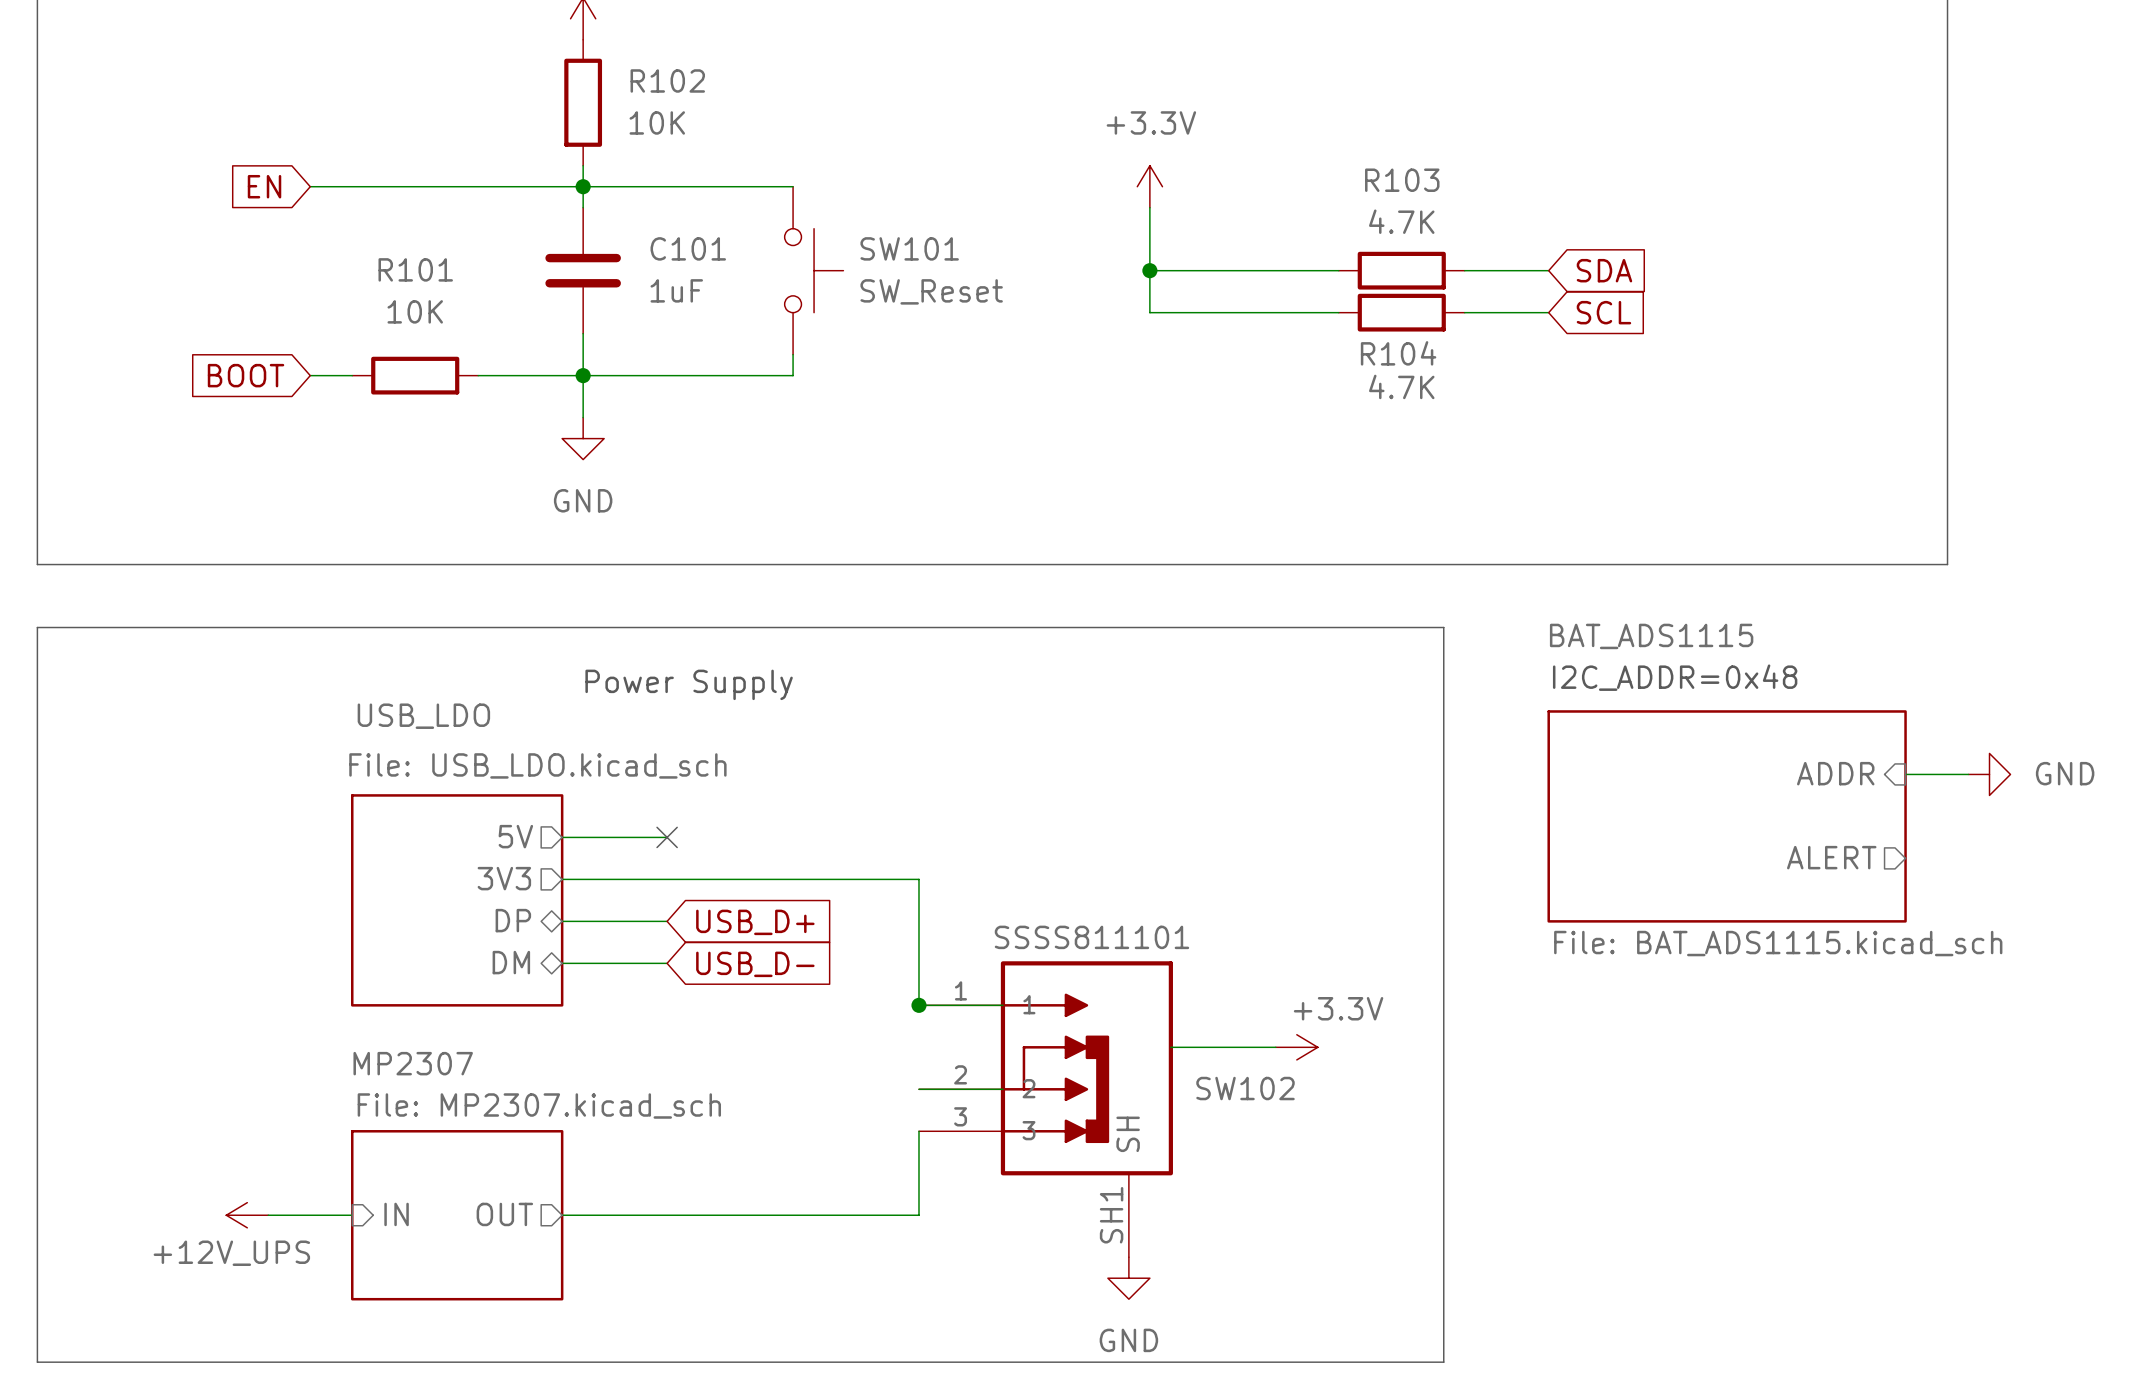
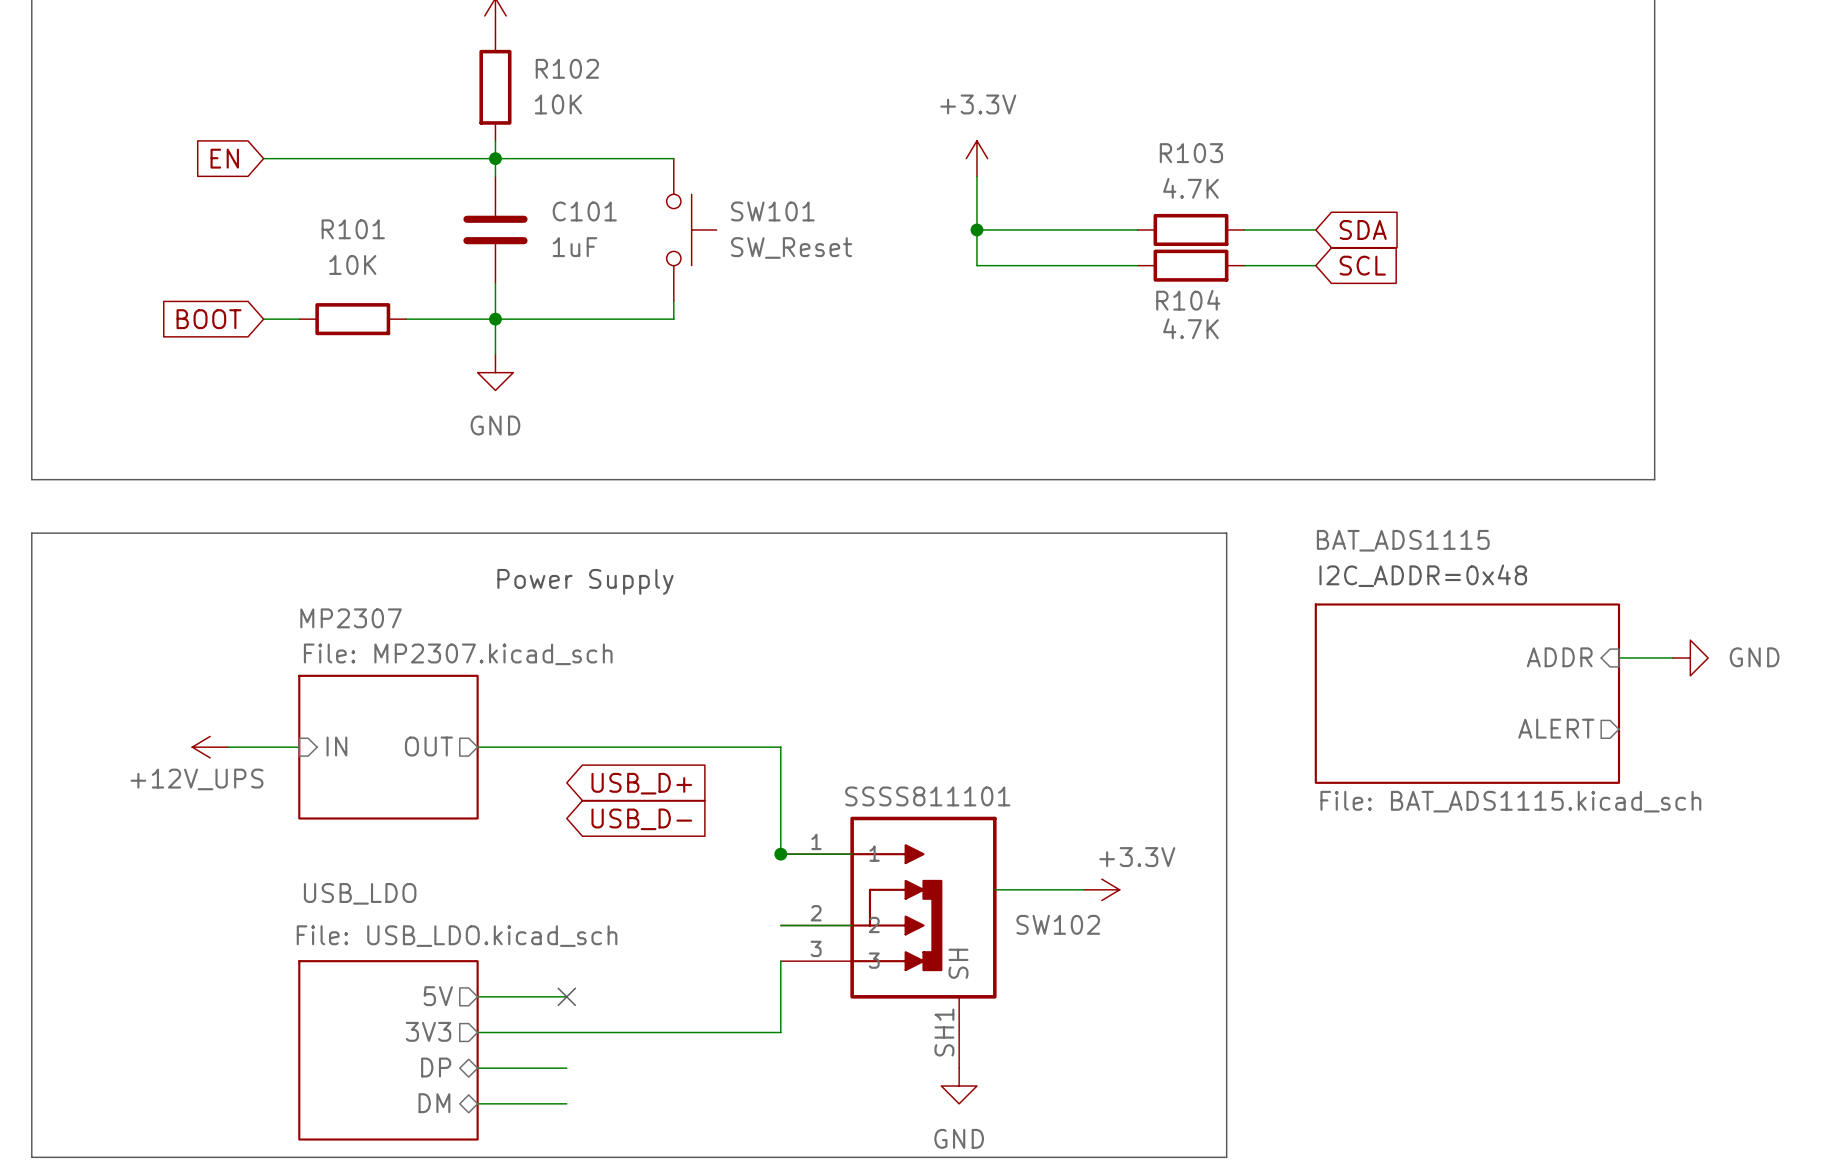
sheet pin position: 5V (515, 836) -> 5V (438, 996)
wire: (562, 837) (667, 837) -> (477, 996) (566, 996)
no-connect mark: (667, 837) -> none
sheet pin: 3V3 (504, 878) -> OUT (428, 746)
sheet USB_LDO position: (457, 900) -> (388, 1050)
sheet pin position: DP (513, 920) -> DP (436, 1067)
wire: (562, 921) (667, 921) -> (477, 1068) (566, 1068)
sheet pin position: DM (511, 962) -> DM (434, 1103)
wire: (562, 963) (667, 963) -> (477, 1103) (566, 1103)
no-connect mark: none -> (566, 996)
sheet pin position: IN (396, 1214) -> IN (336, 746)
sheet pin: OUT (504, 1214) -> 3V3 (428, 1031)
power symbol position: +12V_UPS (247, 1215) -> +12V_UPS (210, 747)
wire: (268, 1215) (352, 1215) -> (227, 747) (299, 747)
sheet MP2307 position: (457, 1215) -> (388, 747)

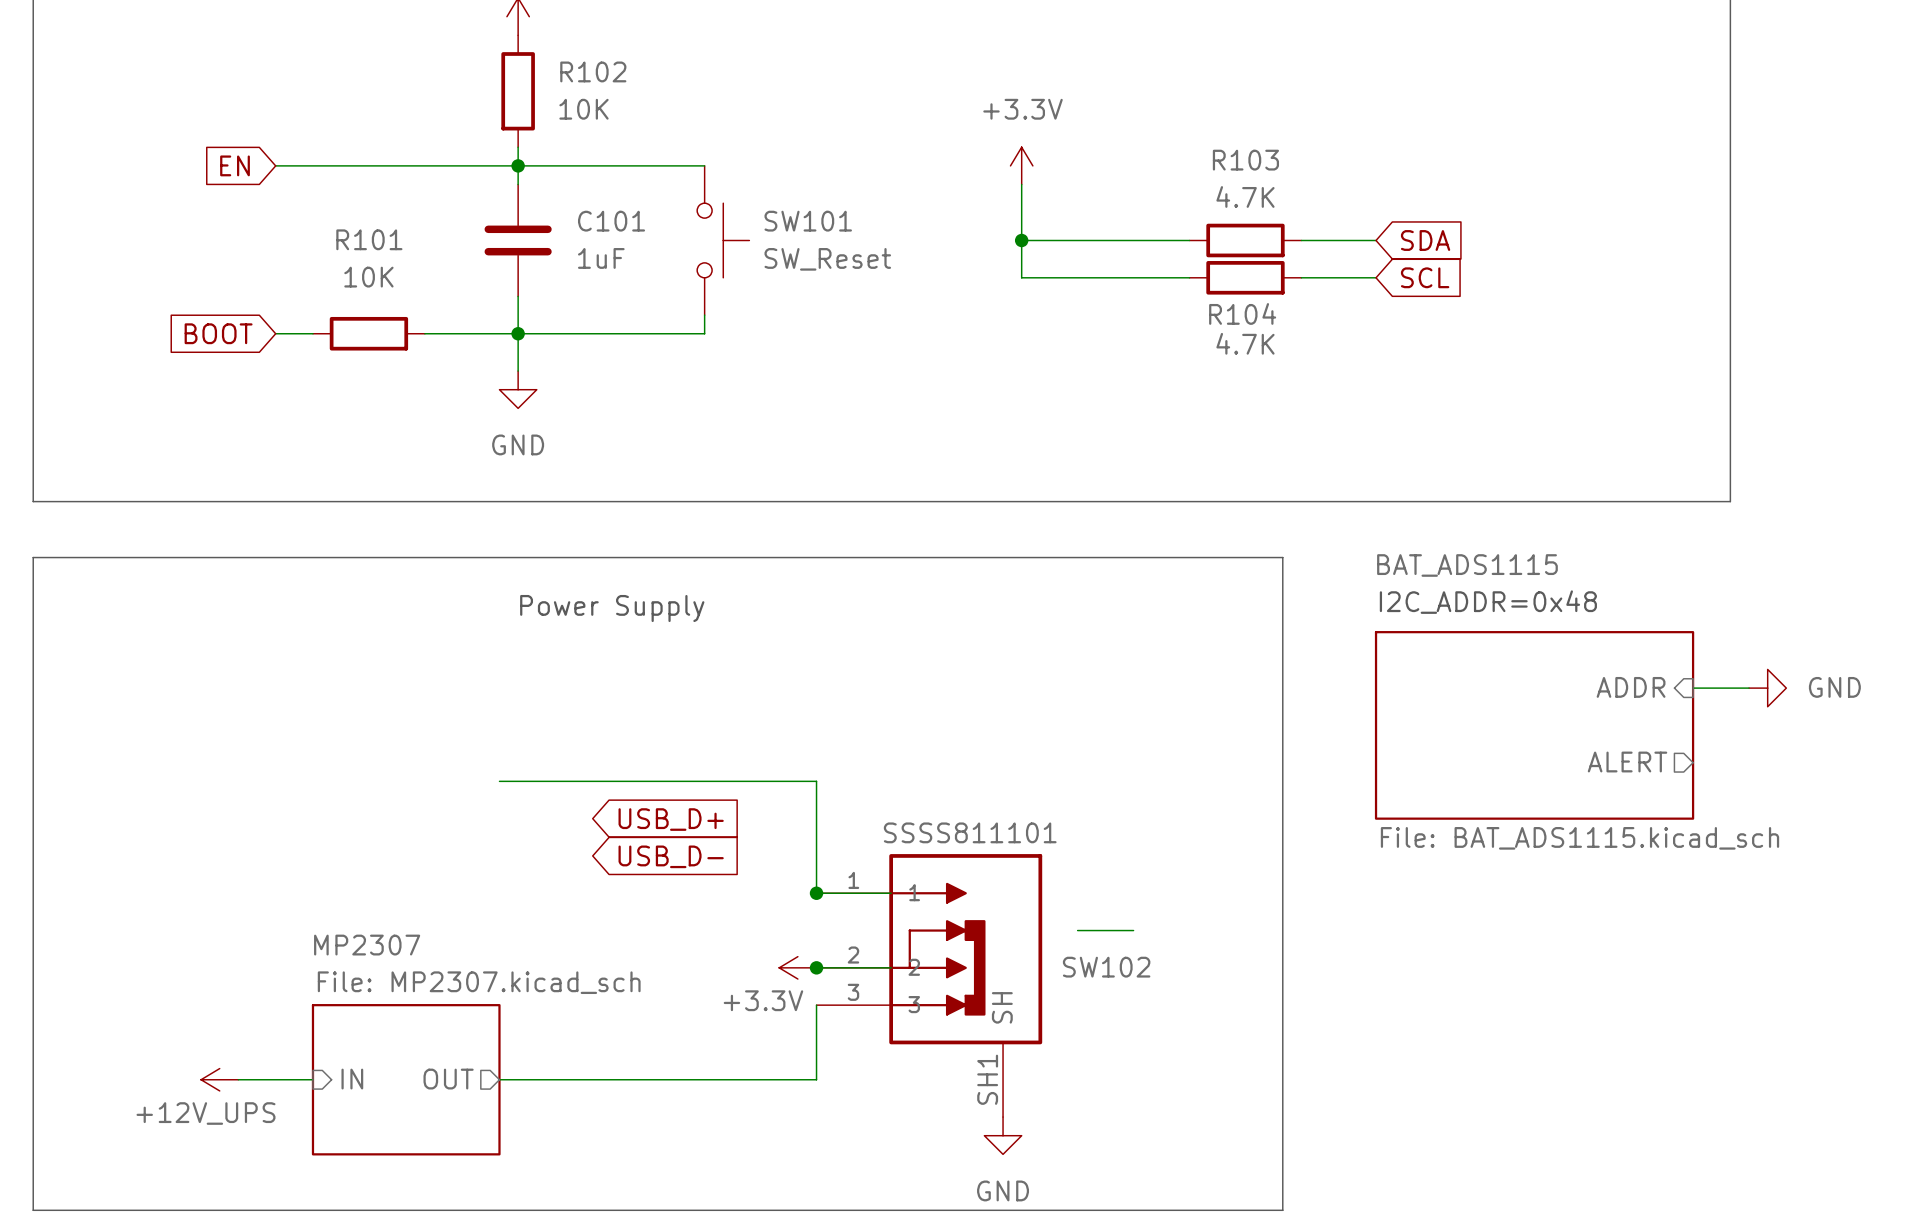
sheet pin position: IN (336, 746) -> IN (352, 1079)
sheet pin: OUT (428, 746) -> none
power symbol position: +12V_UPS (210, 747) -> +12V_UPS (219, 1079)
wire: (227, 747) (299, 747) -> (238, 1079) (312, 1079)
sheet MP2307 position: (388, 747) -> (406, 1079)
wire: (994, 889) (1030, 889) -> none
power symbol rotation: 0° (1101, 889) -> 180° (797, 967)
power symbol position: +3.3V (1101, 889) -> +3.3V (797, 967)
junction: none -> (816, 967)
sheet pin: 5V (438, 996) -> none
wire: (477, 996) (566, 996) -> none
no-connect mark: (566, 996) -> none
sheet pin: 3V3 (428, 1031) -> OUT (448, 1079)
sheet USB_LDO: File: USB_LDO.kicad_sch (388, 1050) -> none
sheet pin: DP (436, 1067) -> none
wire: (477, 1068) (566, 1068) -> none
sheet pin: DM (434, 1103) -> none
wire: (477, 1103) (566, 1103) -> none

